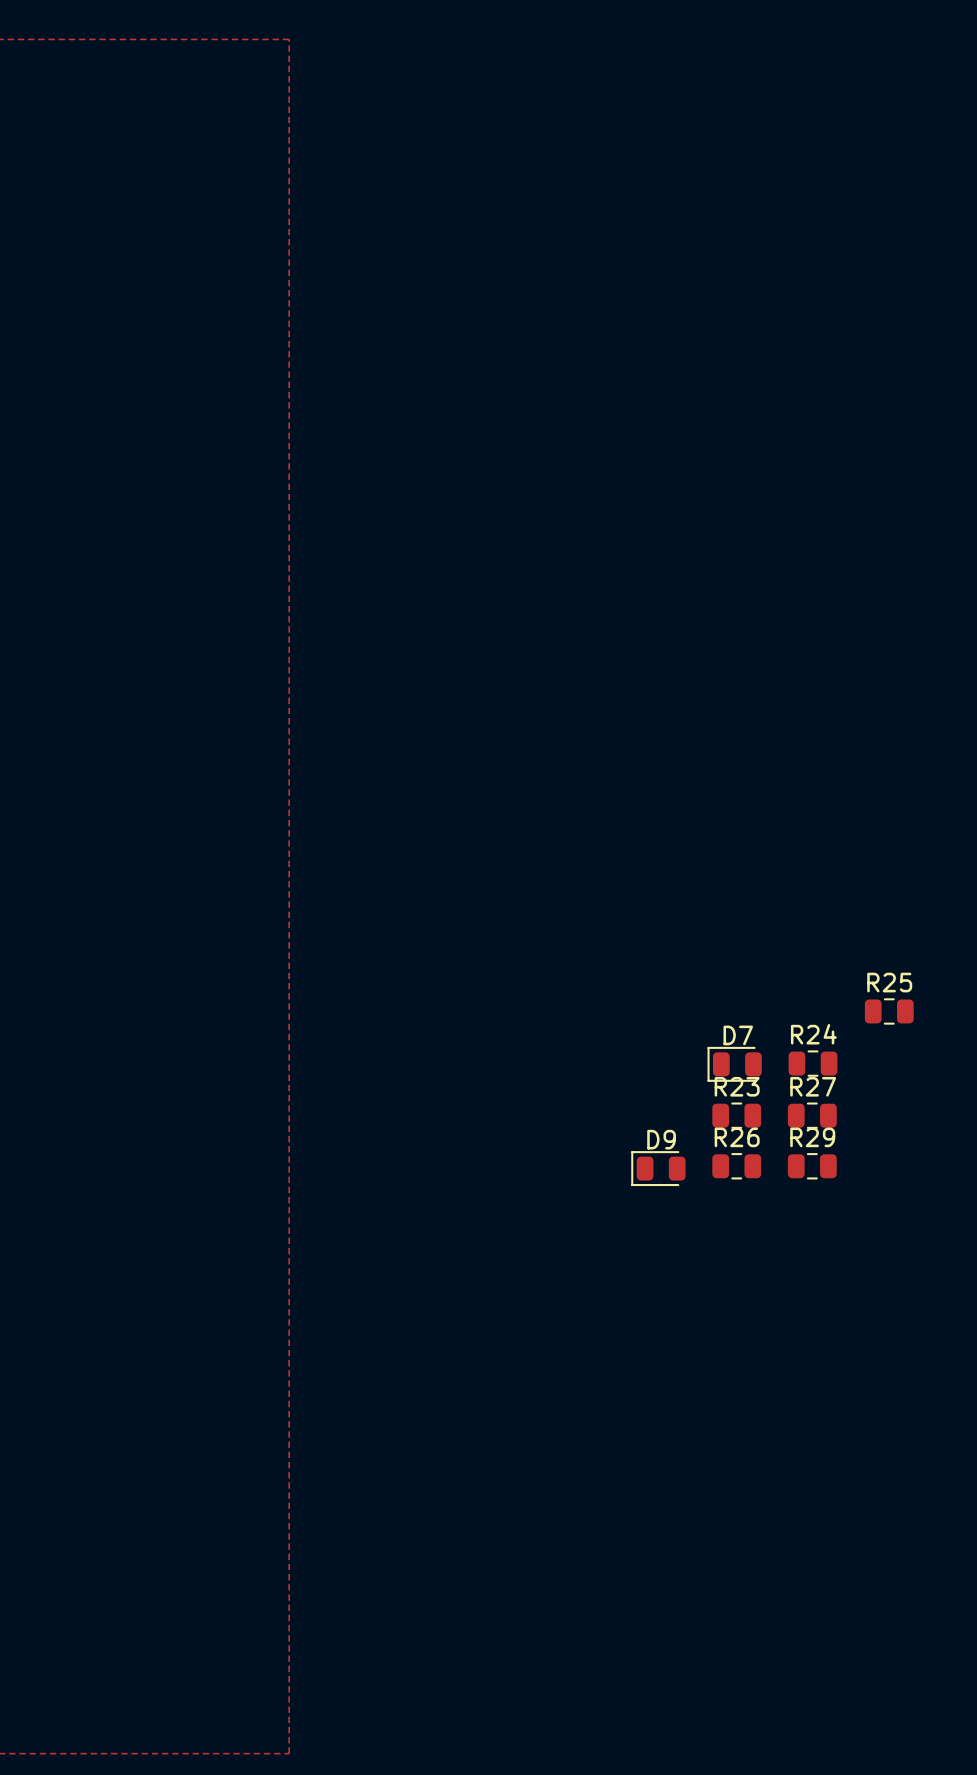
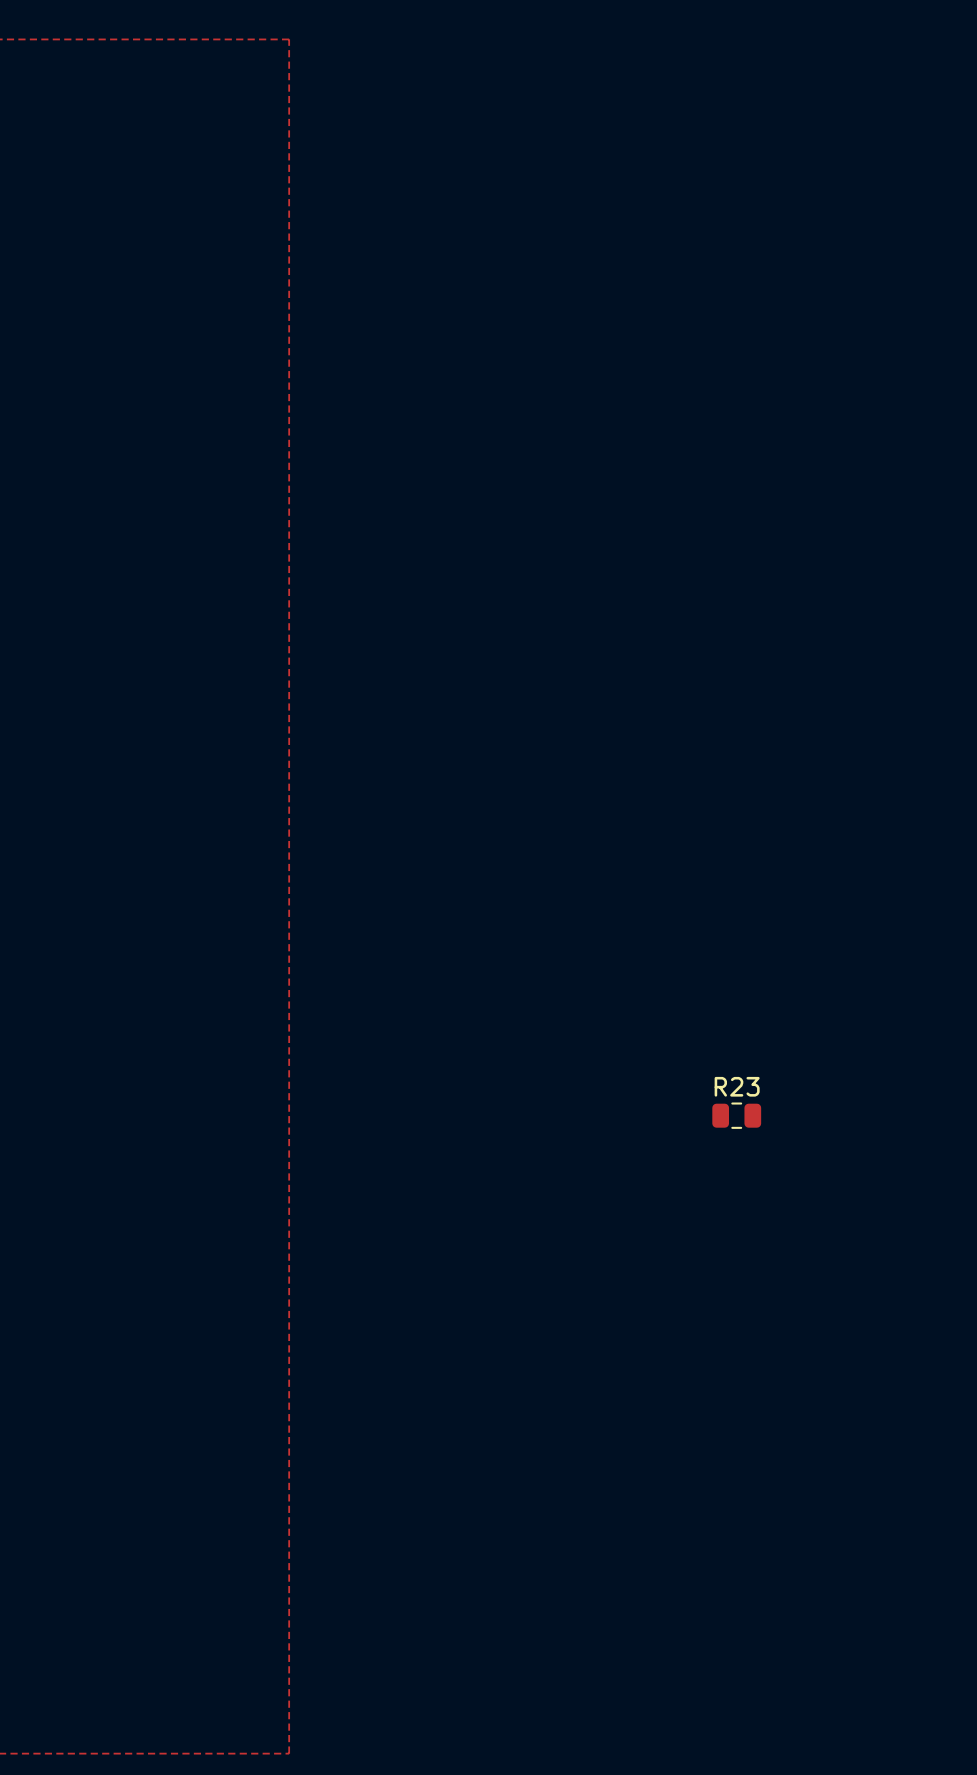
R25: (889, 1011) -> none
R24: (813, 1063) -> none
D7: (734, 1064) -> none
R27: (812, 1115) -> none
R26: (736, 1166) -> none
R29: (812, 1166) -> none
D9: (658, 1168) -> none

